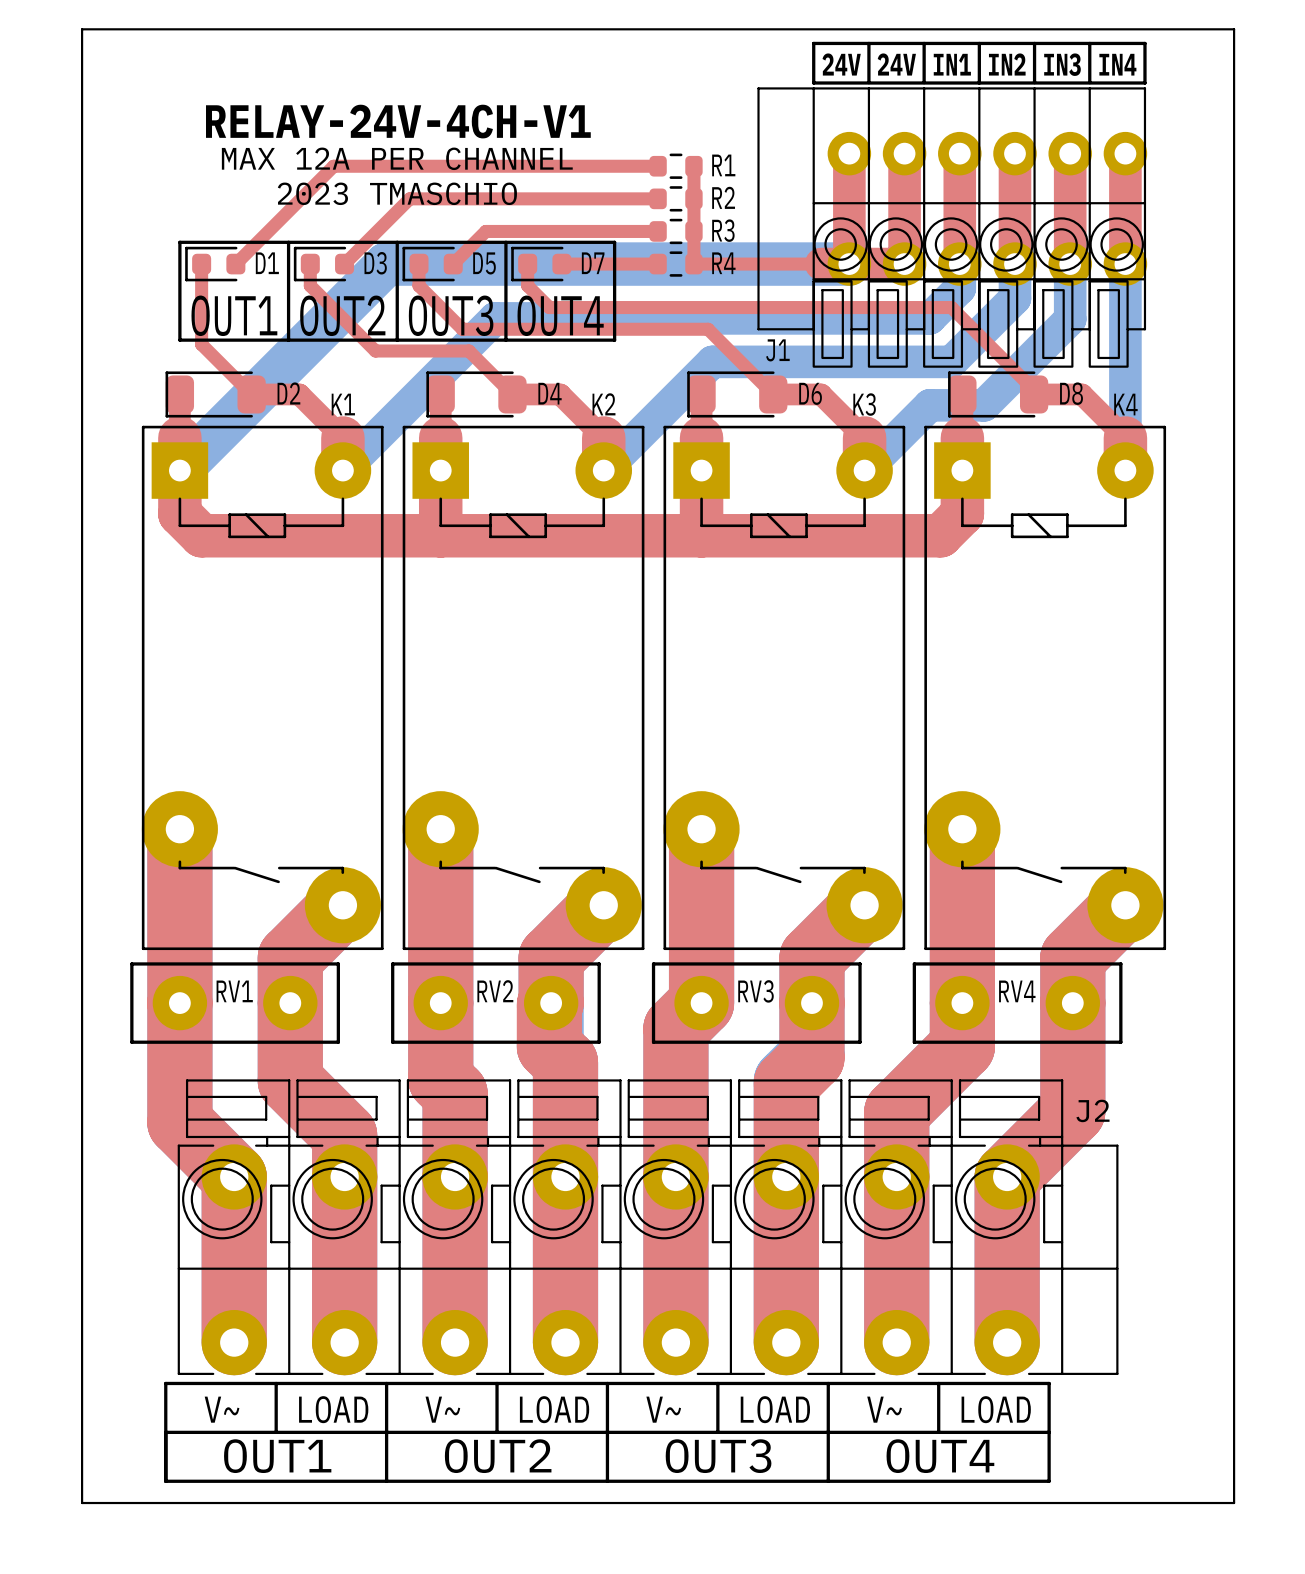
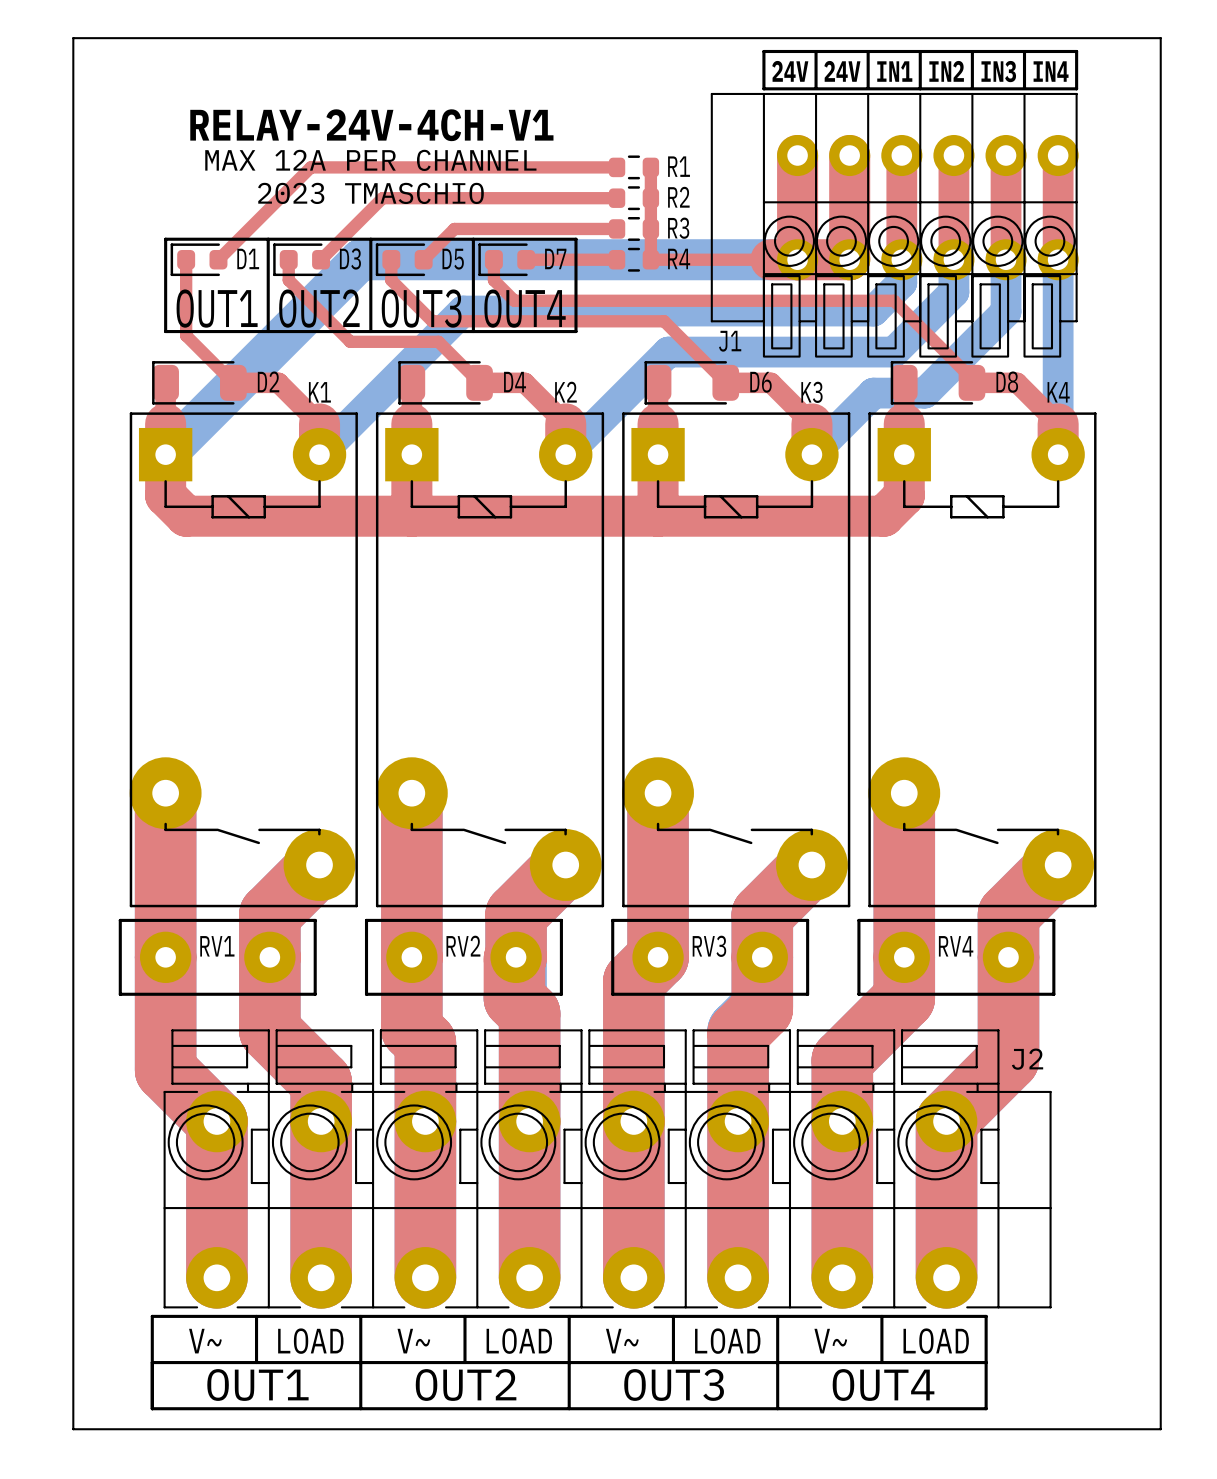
top track width: thin (849, 153) (849, 264) -> thick (797, 155) (797, 259)
top track width: thin (904, 153) (904, 264) (821, 264) -> thick (849, 155) (849, 259) (770, 259)

